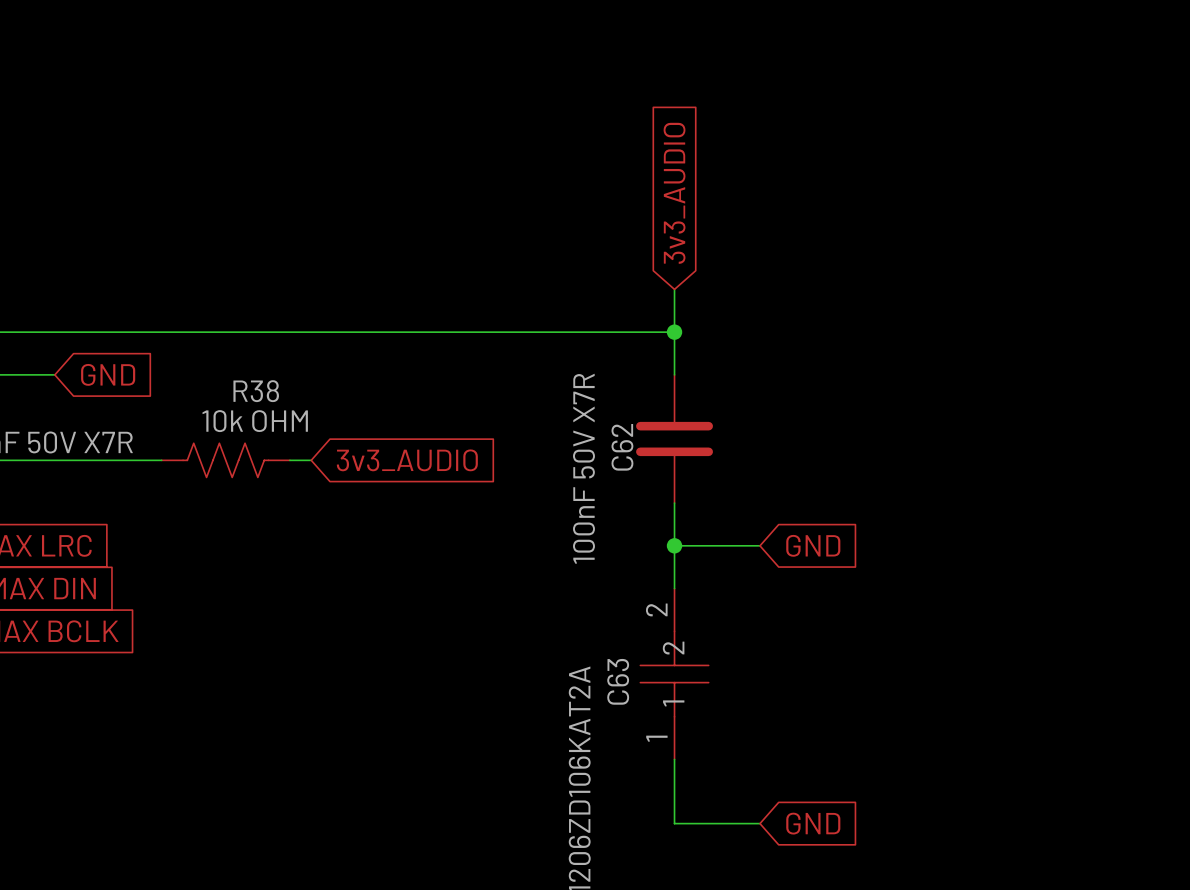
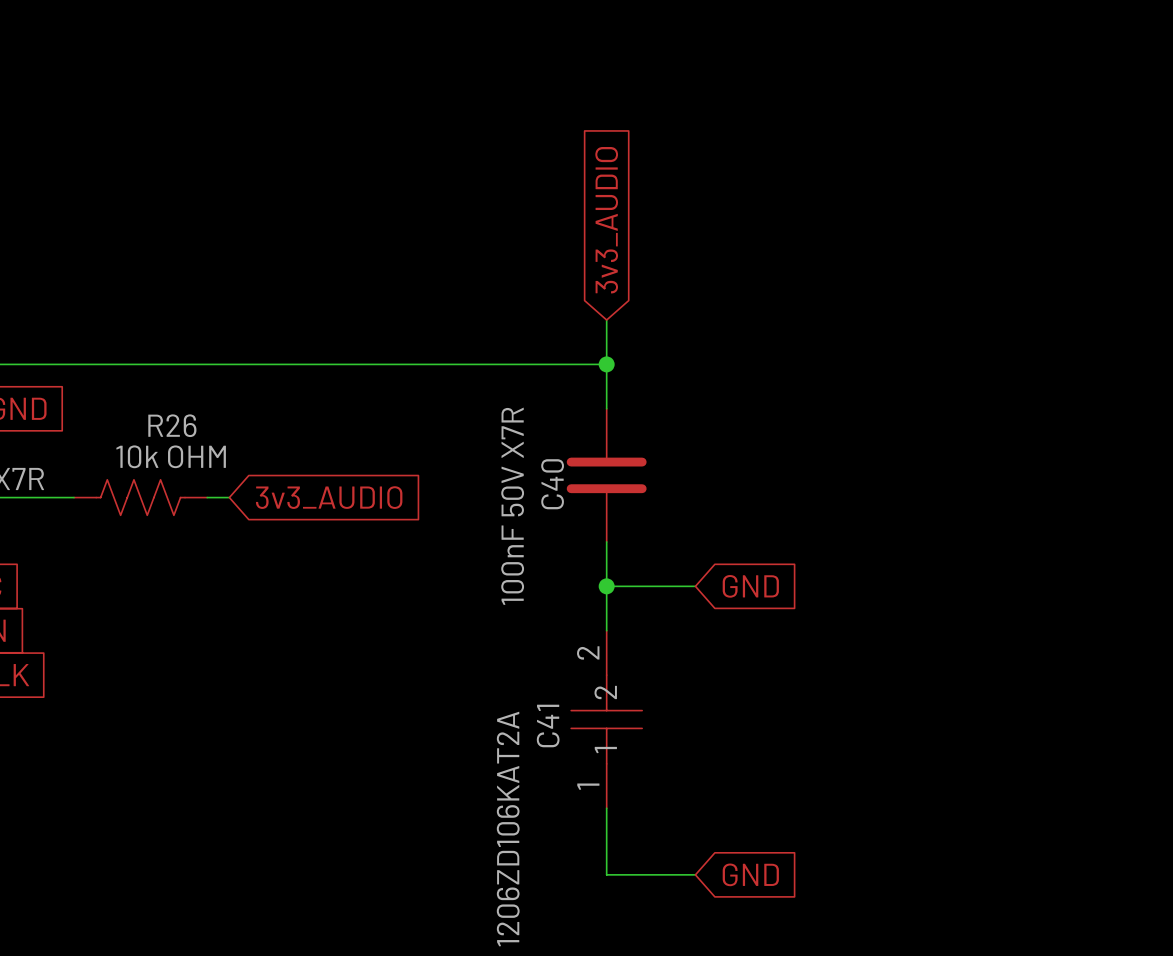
R38 name: R38 (256, 391) -> R26 (172, 425)
C62 name: C62 (622, 447) -> C40 (552, 484)
C63 name: C63 (618, 681) -> C41 (548, 725)

